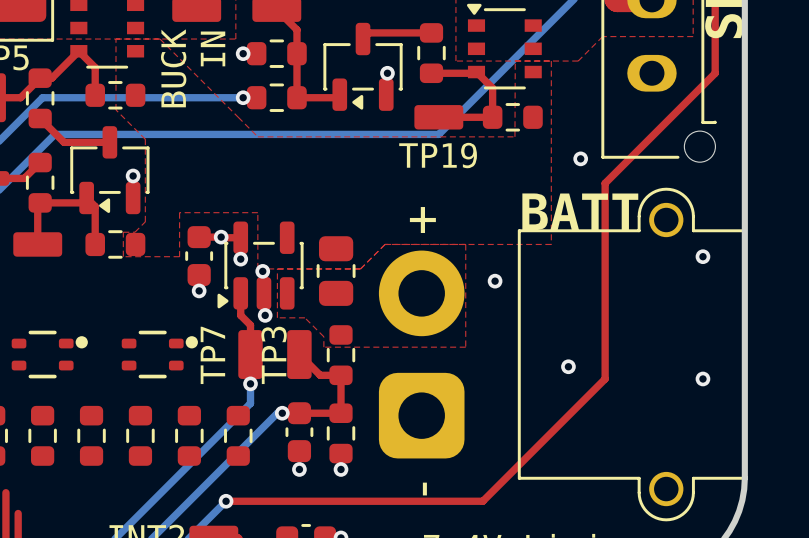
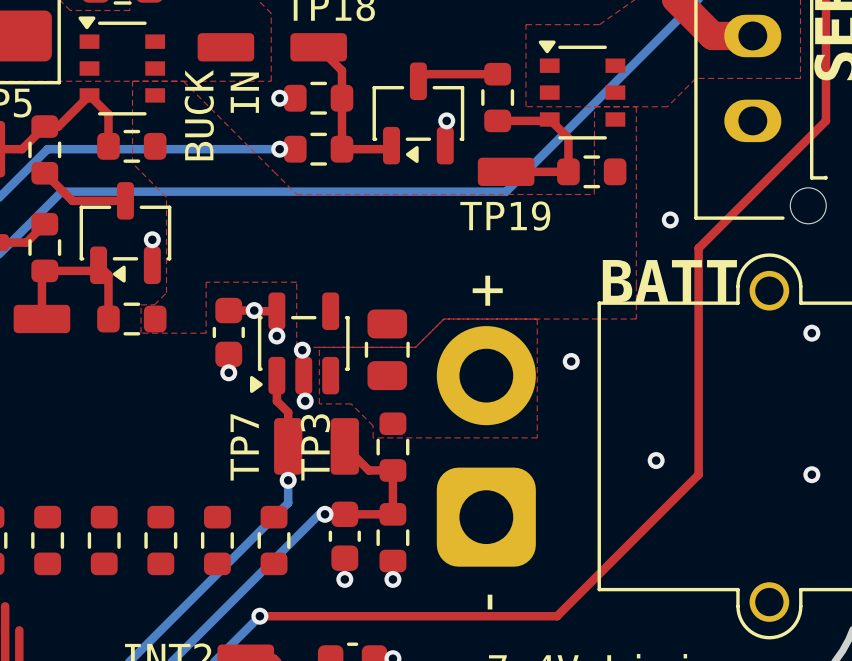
part: (49, 354) -> none
part: (159, 354) -> none

